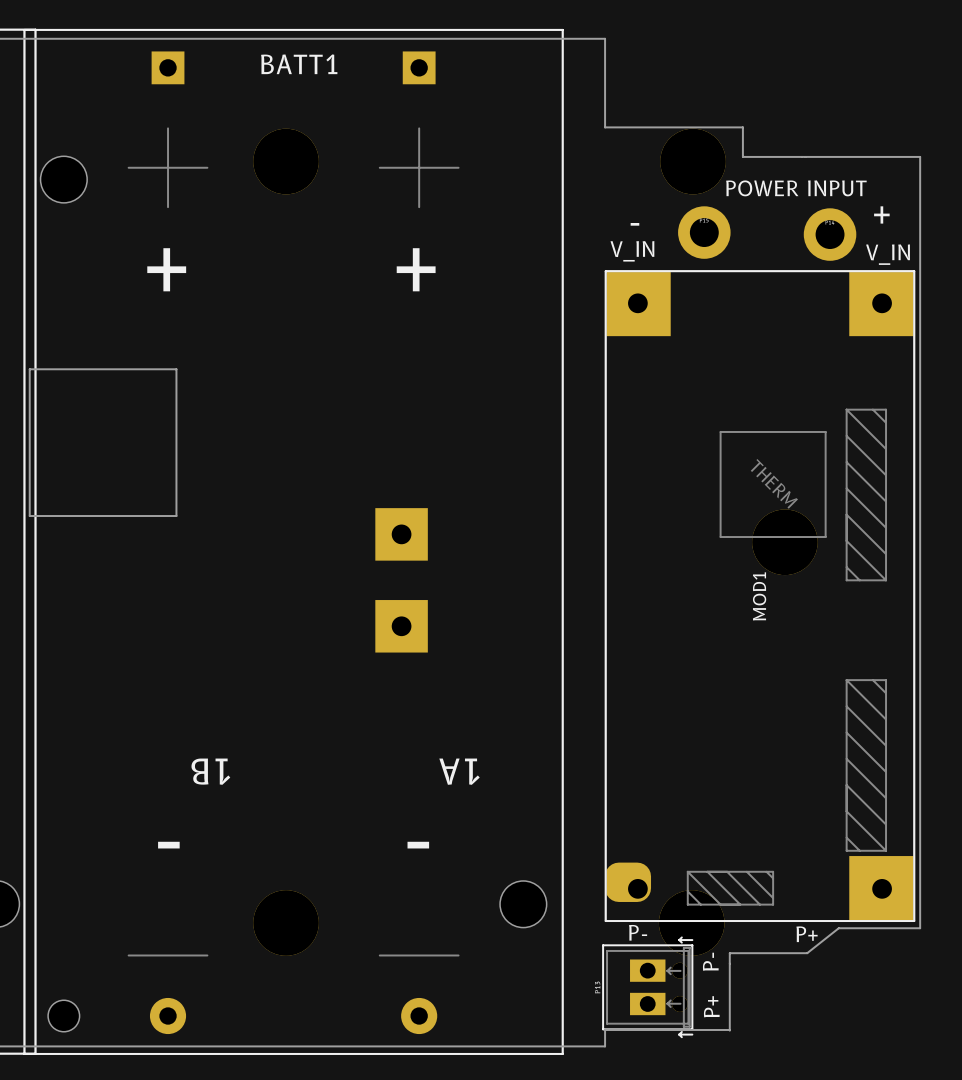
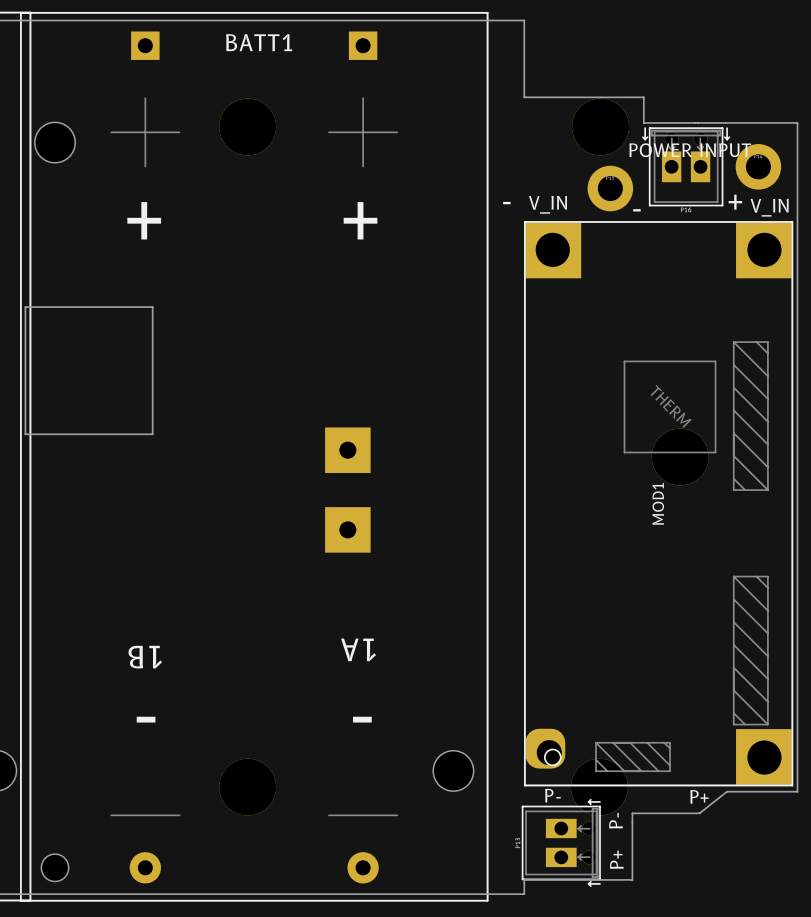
part: none -> (686, 166)
text position: + (881, 214) -> + (735, 202)
text: - (634, 224) -> none
part position: (830, 234) -> (758, 166)
text: none -> - (506, 203)
text: none -> - (636, 210)
MOD1 footprint: [604, 270, 916, 923] -> [524, 221, 794, 787]
text position: 1B (210, 771) -> 1B (145, 657)
text position: 1A (459, 771) -> 1A (358, 649)

